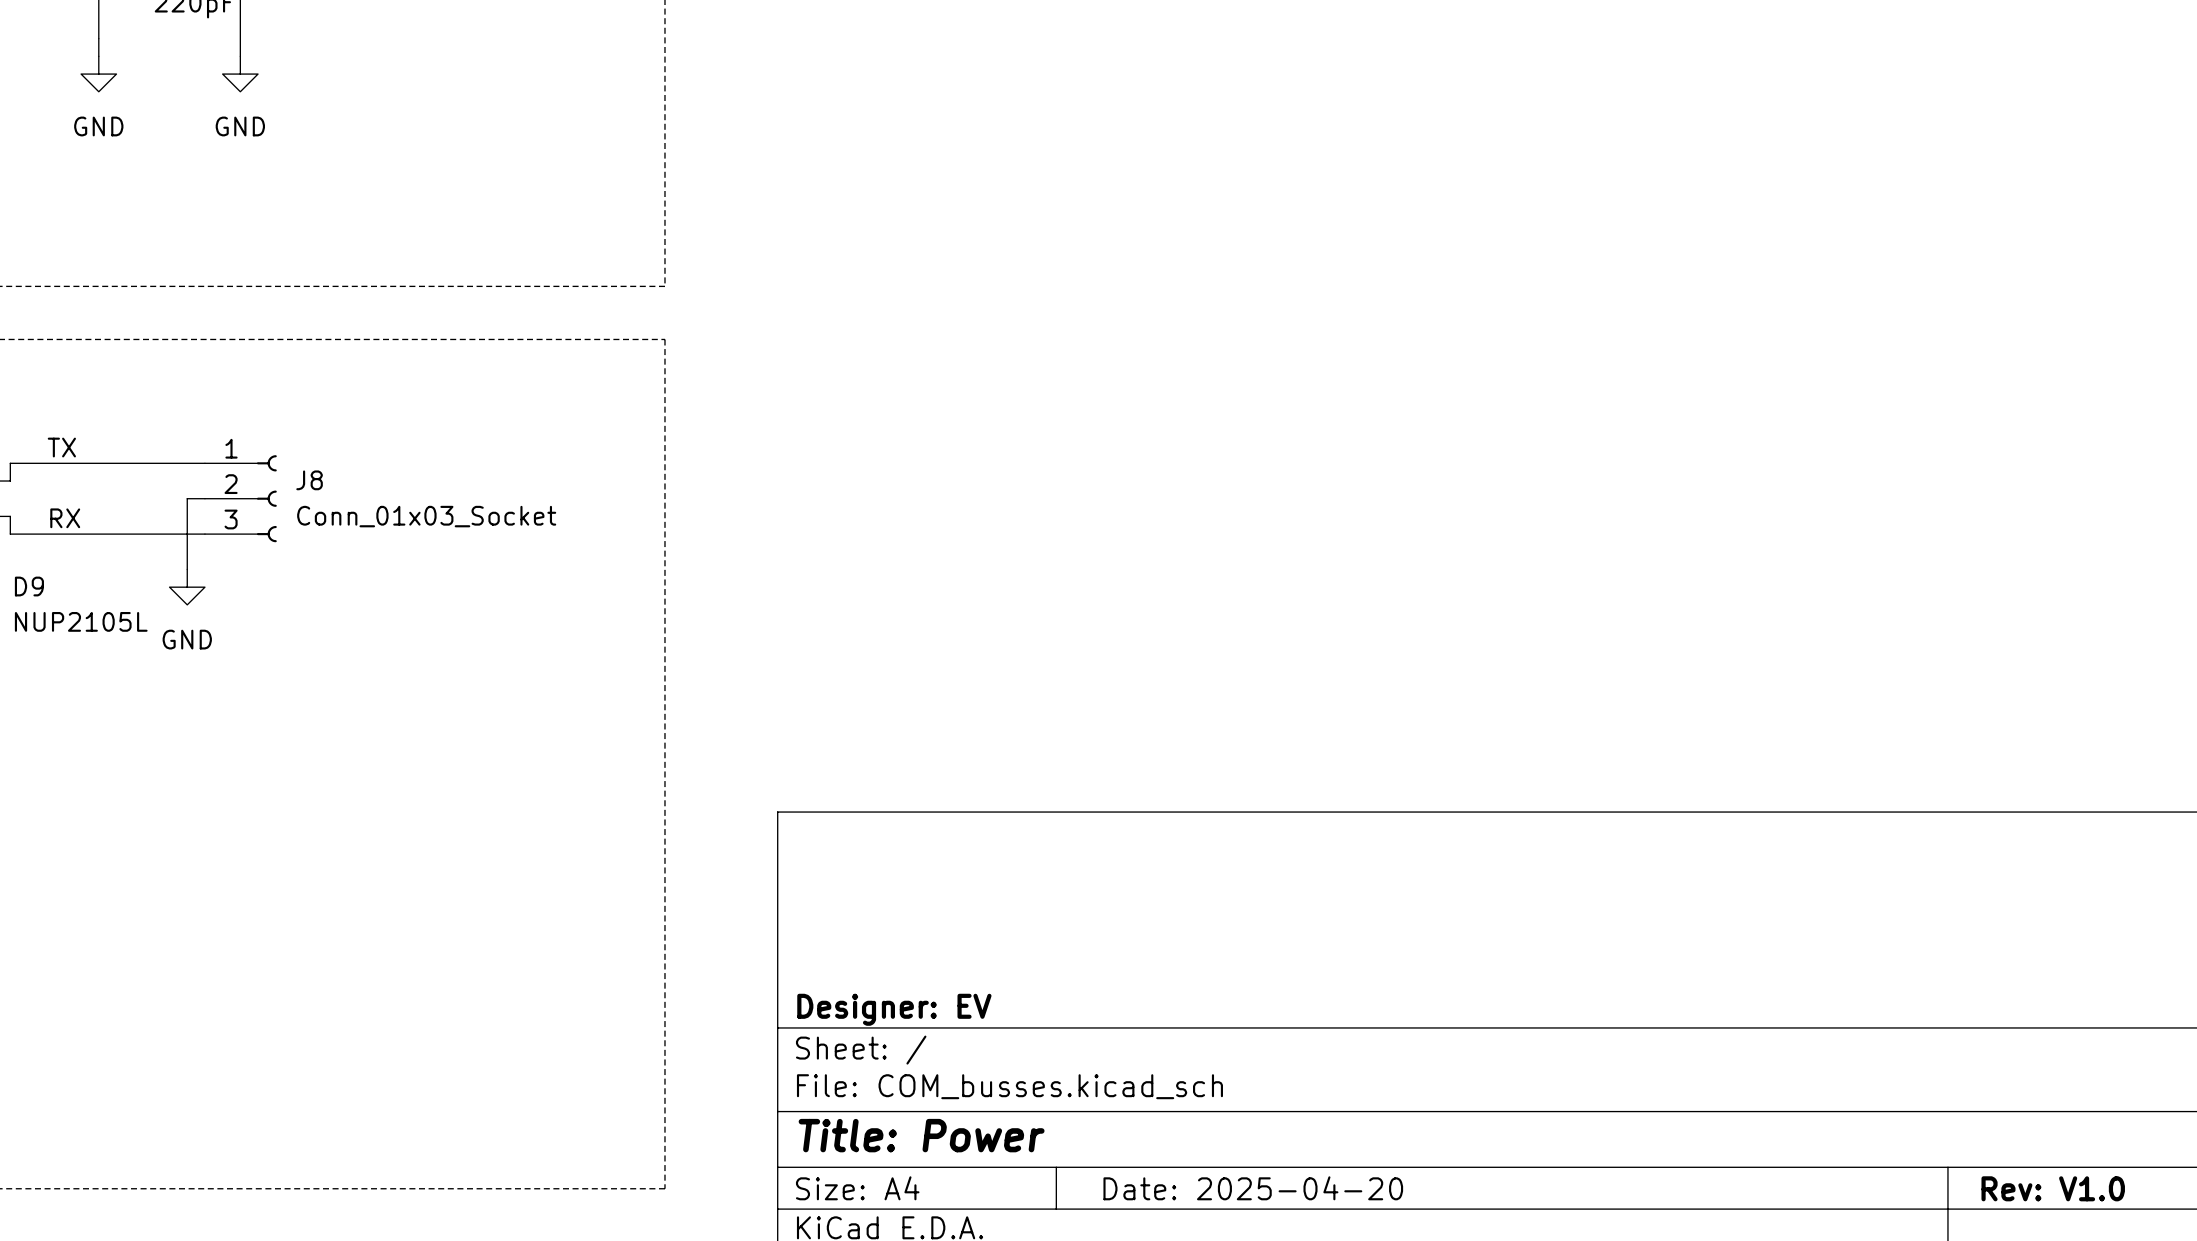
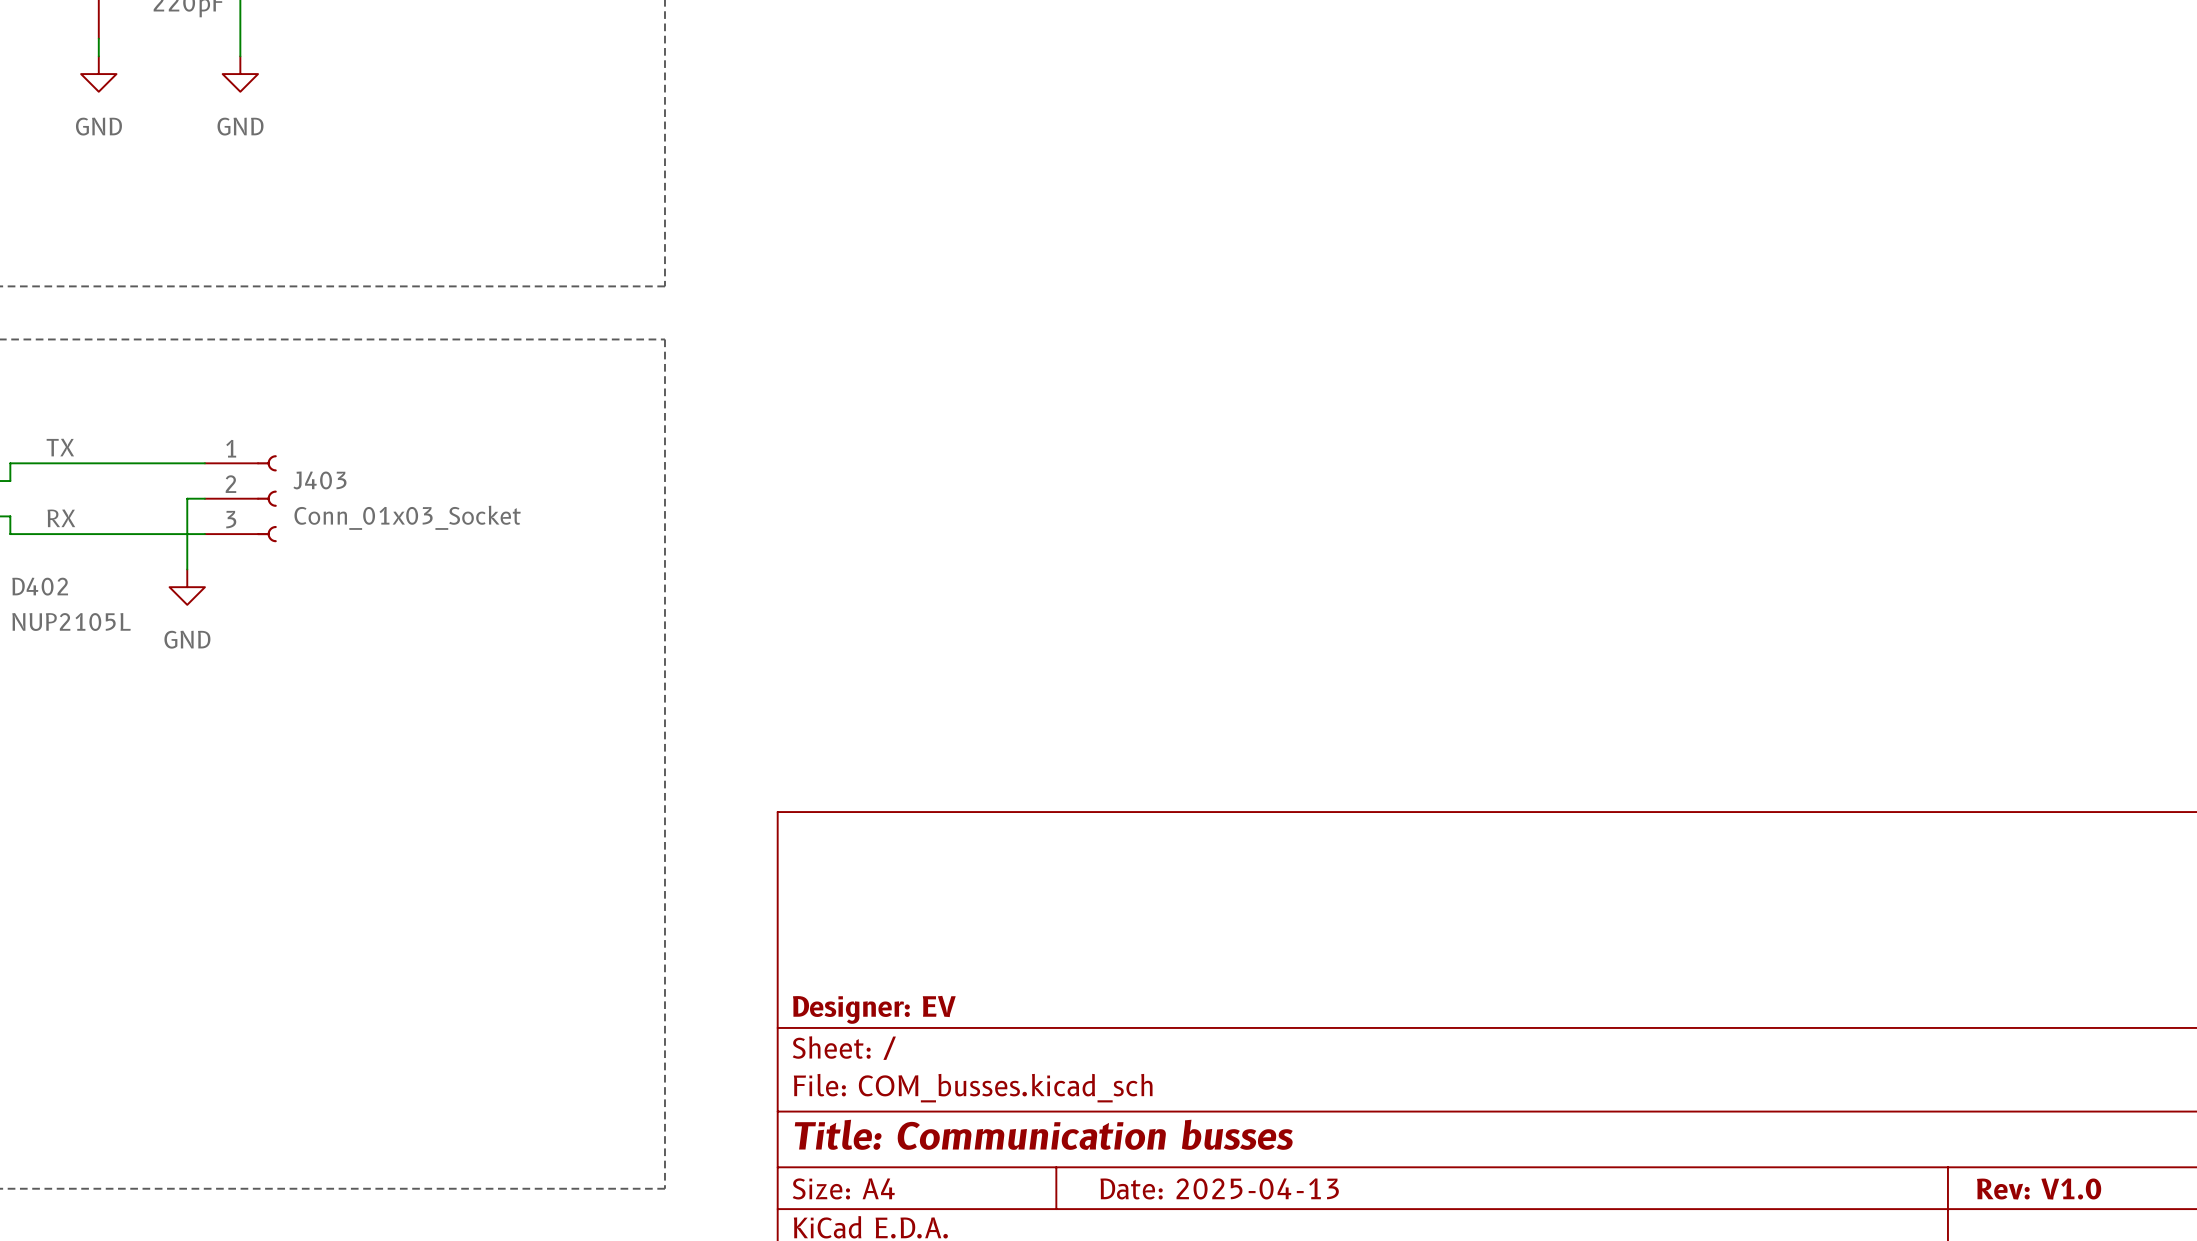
J8 name: J8 (309, 480) -> J403 (319, 480)
D9 name: D9 (29, 586) -> D402 (40, 586)
title block: Title: Power (921, 1135) -> Title: Communication busses (1043, 1134)
title block: Date: 2025-04-20 (1253, 1188) -> Date: 2025-04-13 (1219, 1188)

